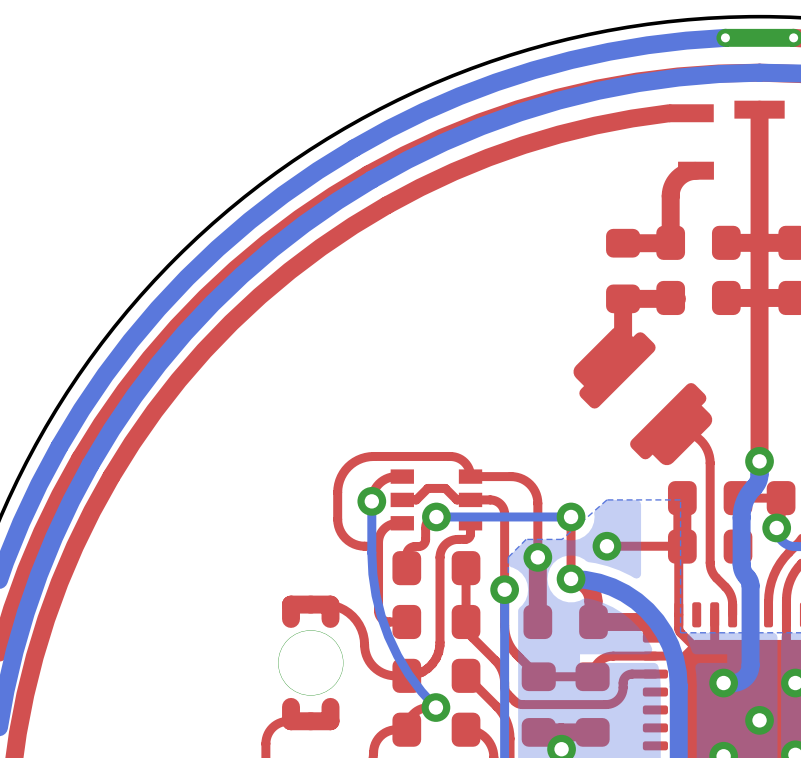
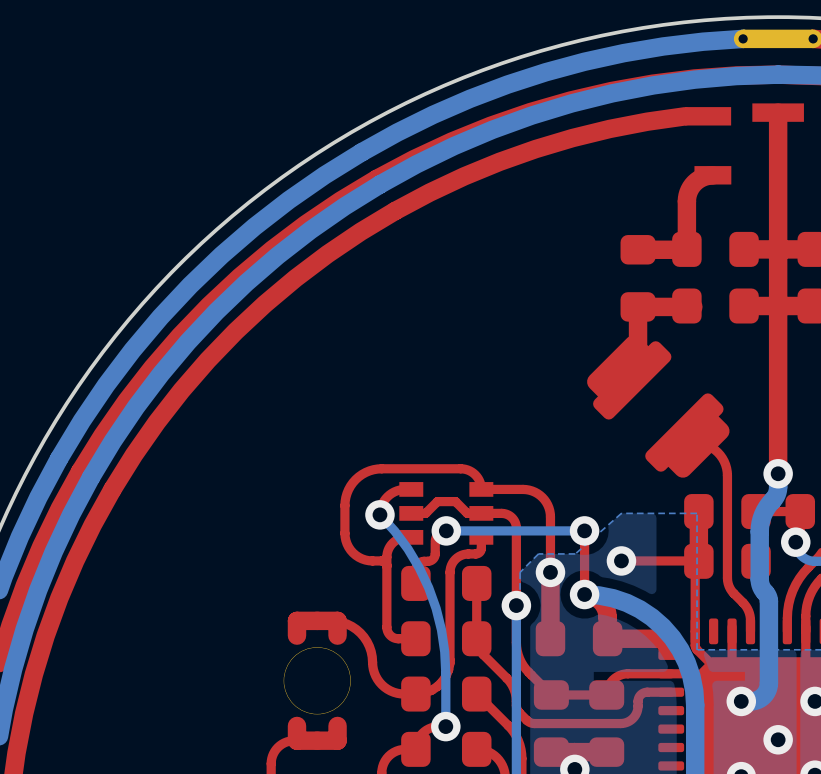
bottom track: (371, 501) (372, 574) (381, 616) (397, 655) (408, 674) (435, 707) -> (379, 514) (407, 548) (419, 567) (436, 608) (444, 651) (445, 726)

